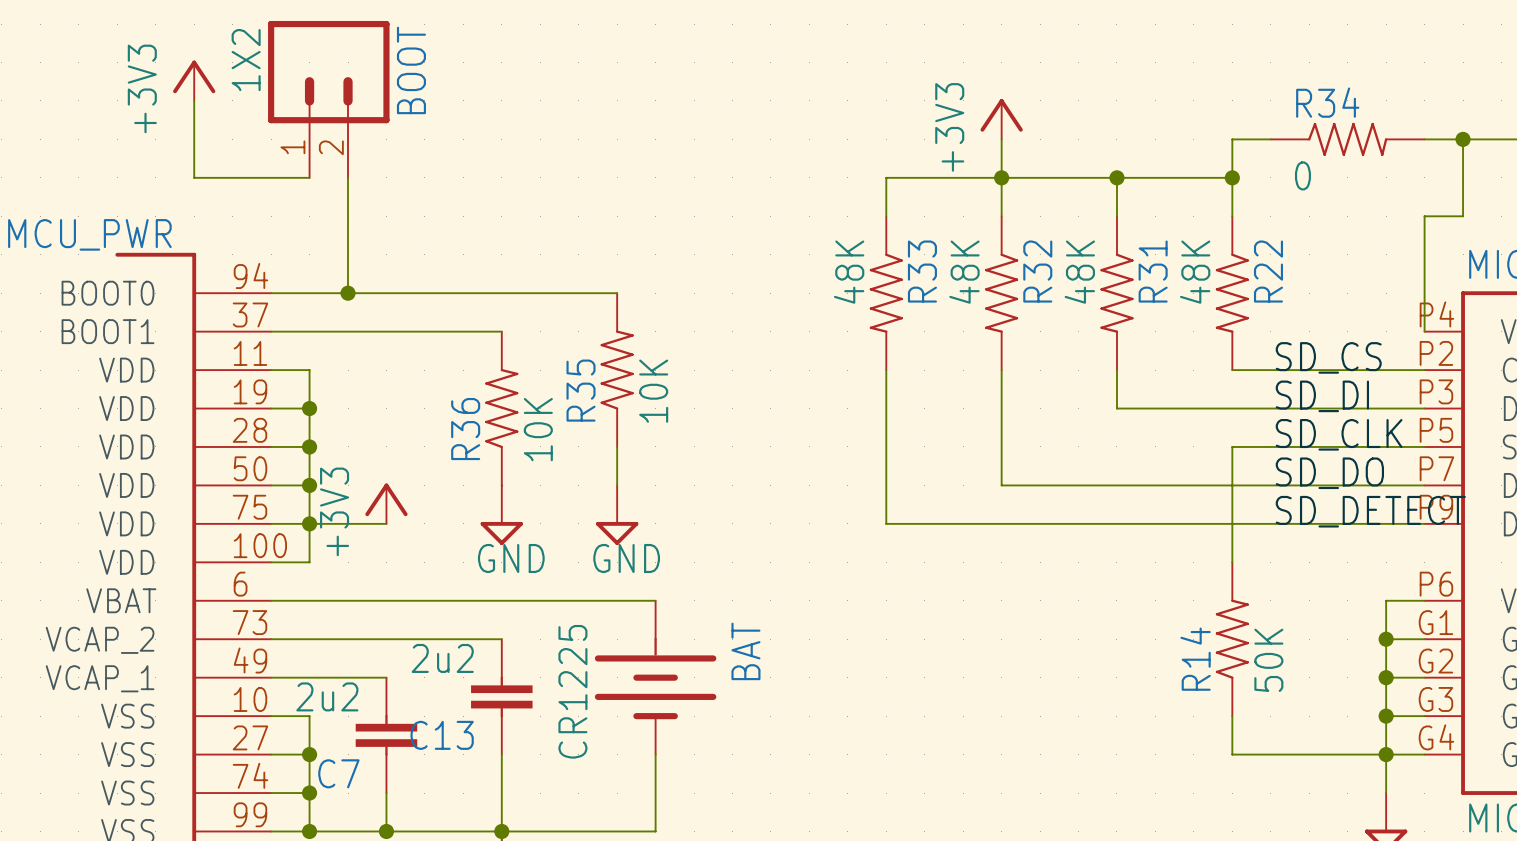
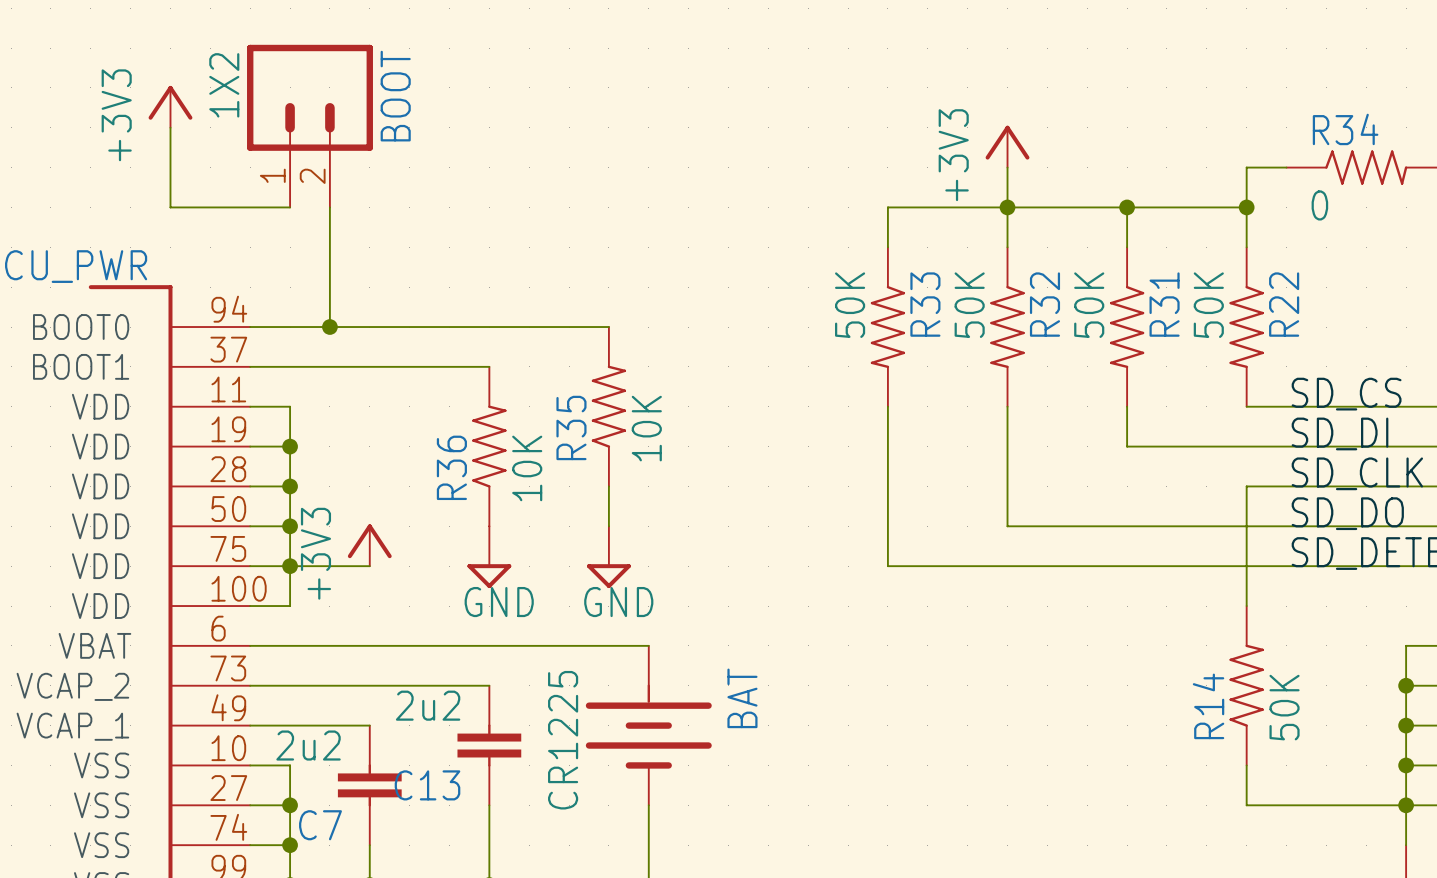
R33 value: 48K (849, 272) -> 50K (850, 305)
R32 value: 48K (964, 272) -> 50K (969, 305)
R31 value: 48K (1079, 272) -> 50K (1089, 305)
R22 value: 48K (1195, 272) -> 50K (1208, 305)

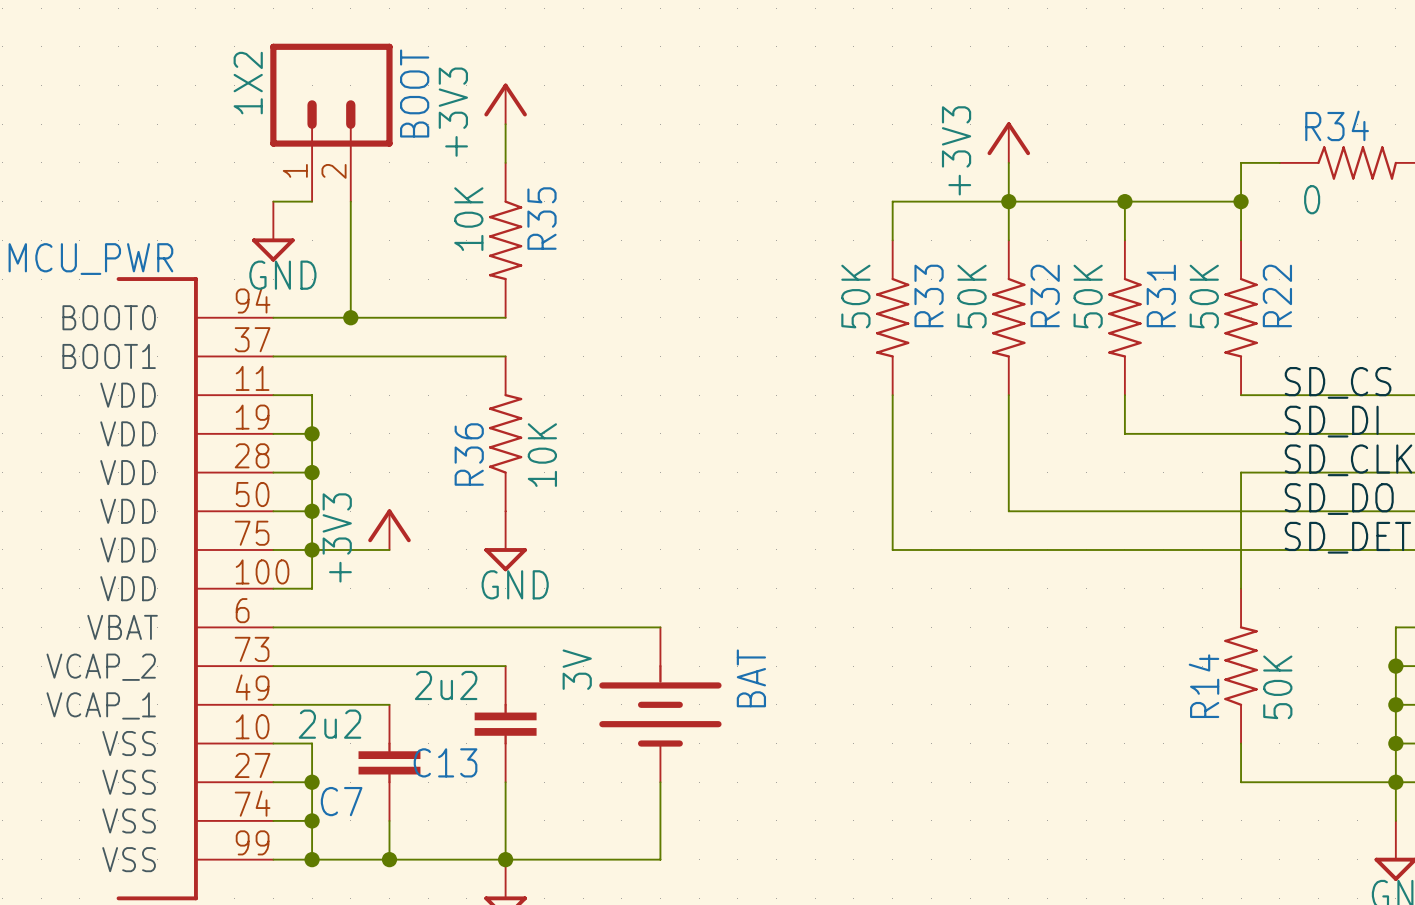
power symbol position: +3V3 (170, 106) -> +3V3 (505, 103)
wire: (170, 127) (170, 207) (250, 207) -> none
power symbol: none -> GND (273, 231)
wire: (489, 327) (608, 327) -> none
R35 rotation: 0° (608, 406) -> 180° (505, 240)
R35 position: (608, 406) -> (505, 240)
wire: (608, 486) (608, 526) -> (505, 124) (505, 162)
power symbol: GND (608, 557) -> none
BAT value: CR1225 (563, 740) -> 3V (577, 669)

